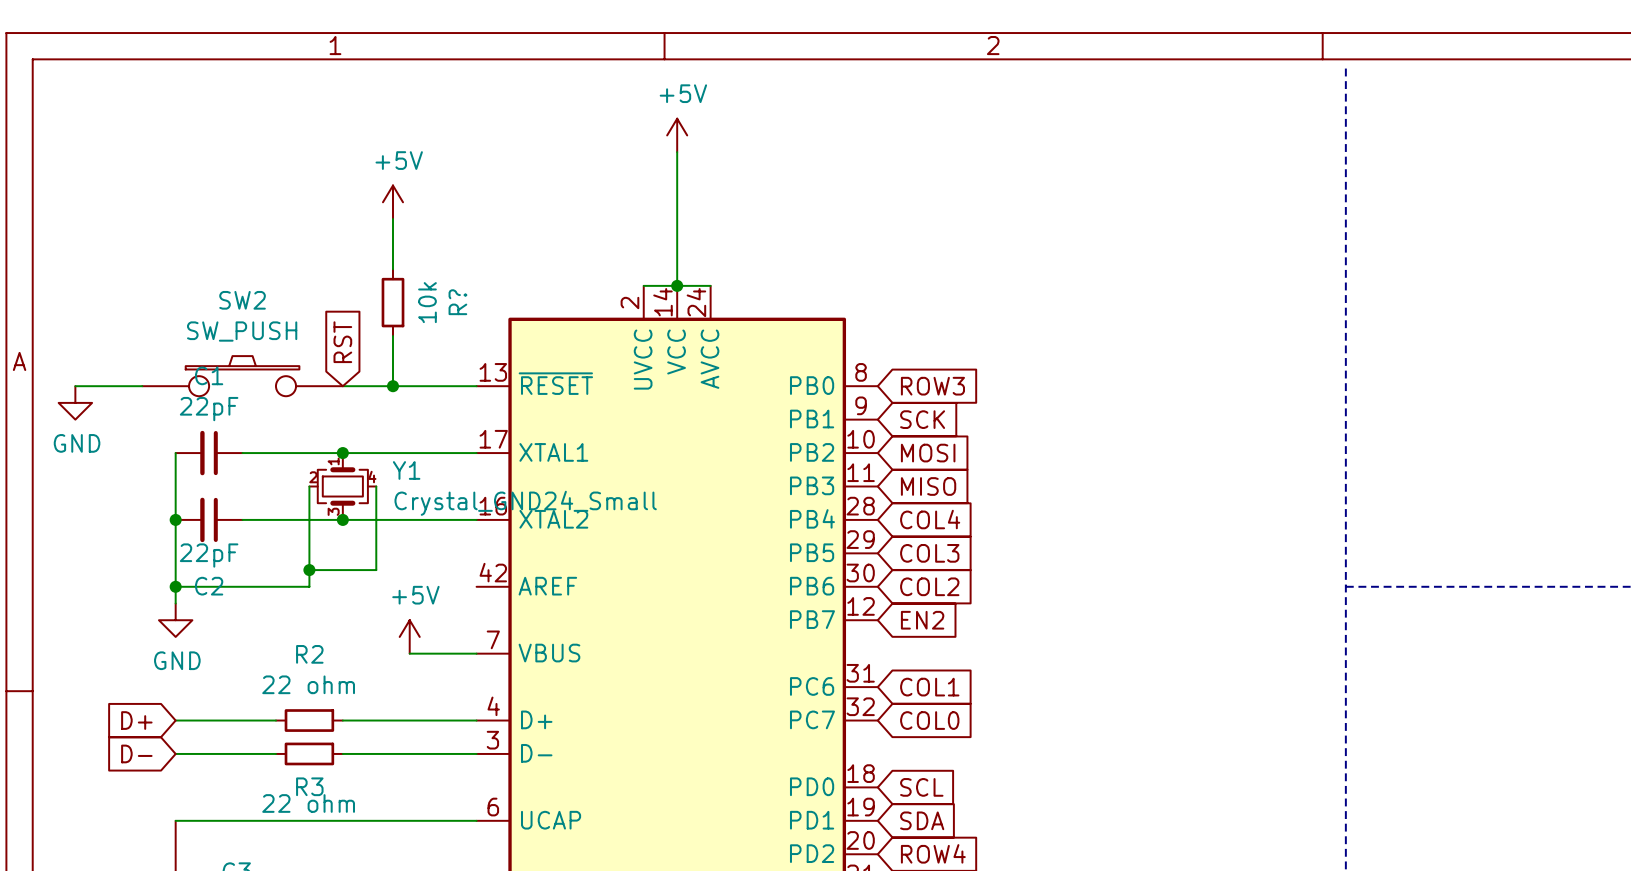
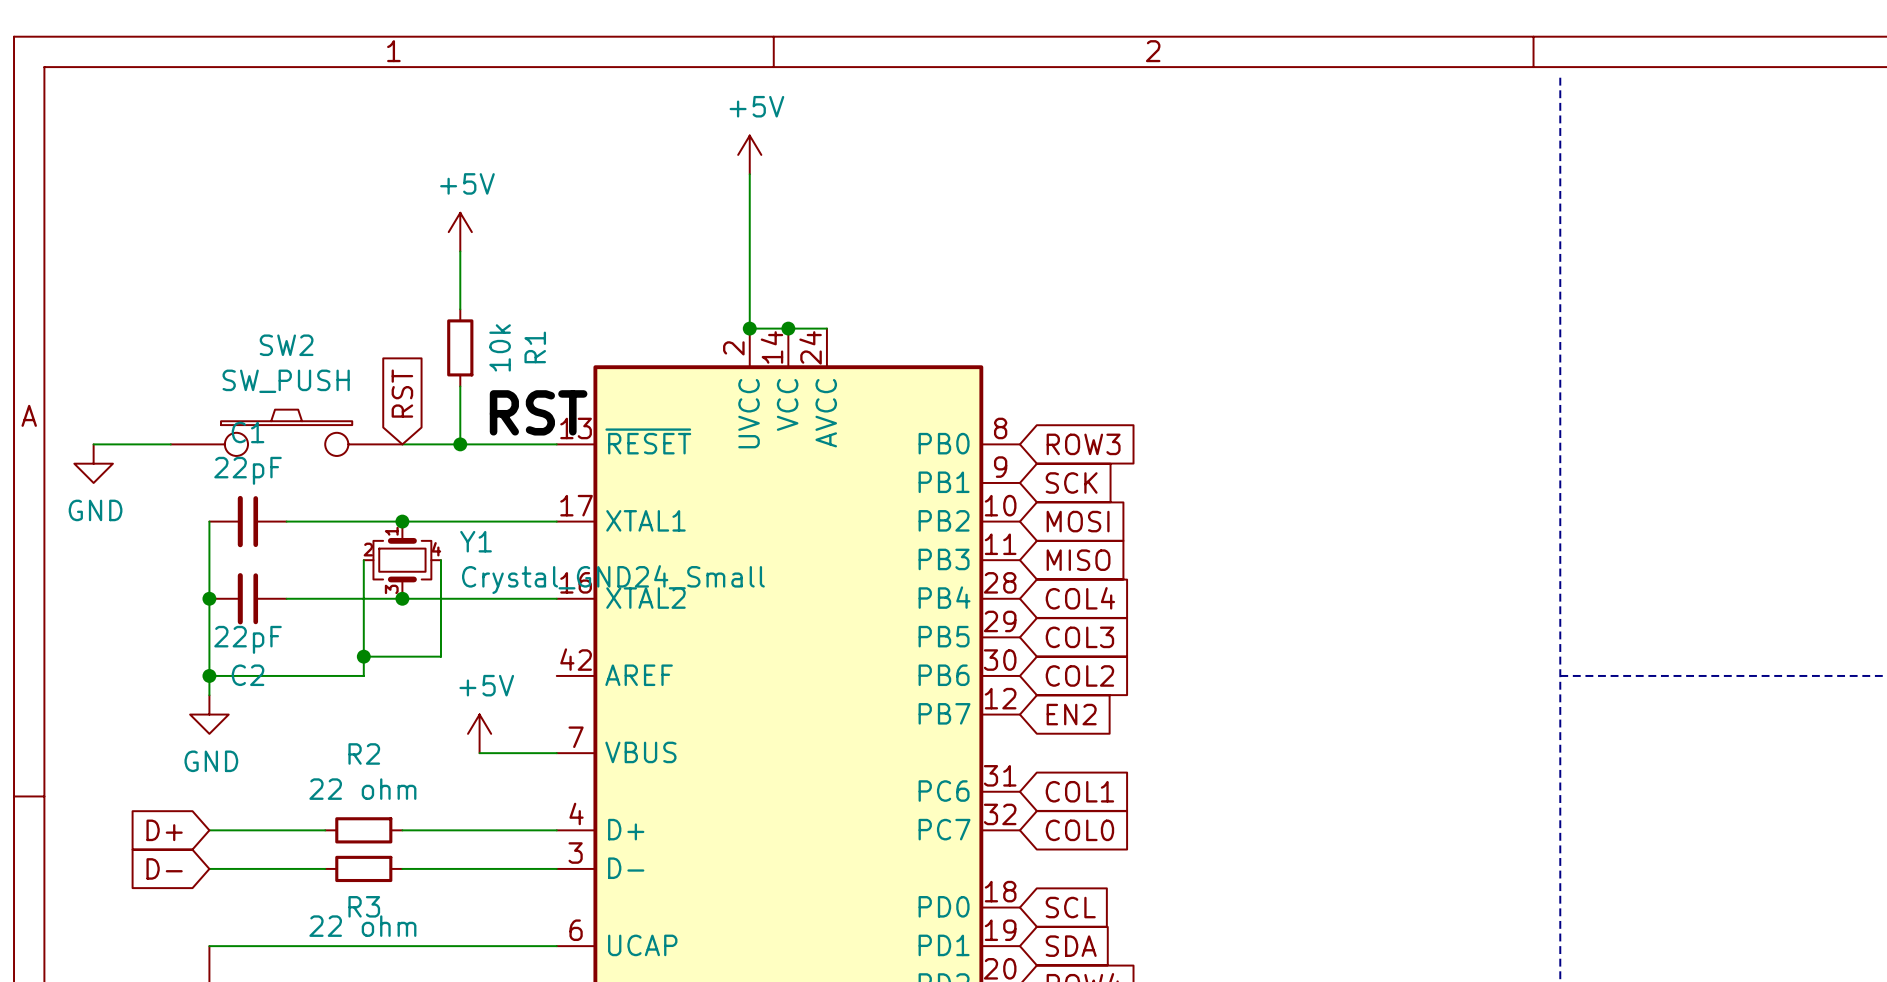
power symbol position: +5V (677, 135) -> +5V (749, 154)
wire: (677, 152) (677, 285) -> (749, 174) (749, 328)
junction: none -> (749, 328)
R? name: R? (457, 302) -> R1 (535, 347)
label: none -> RST (538, 412)

